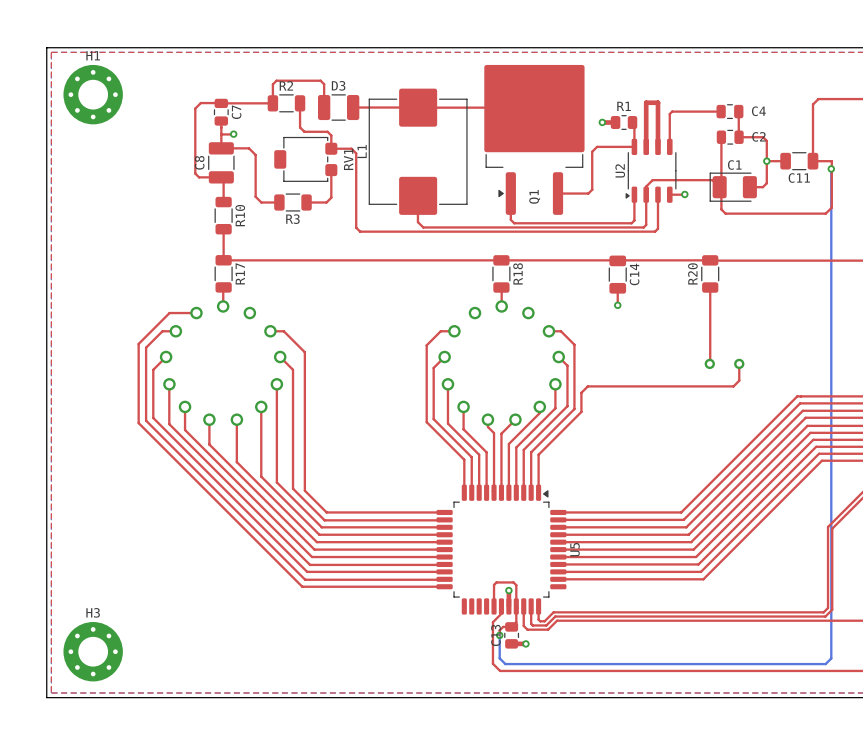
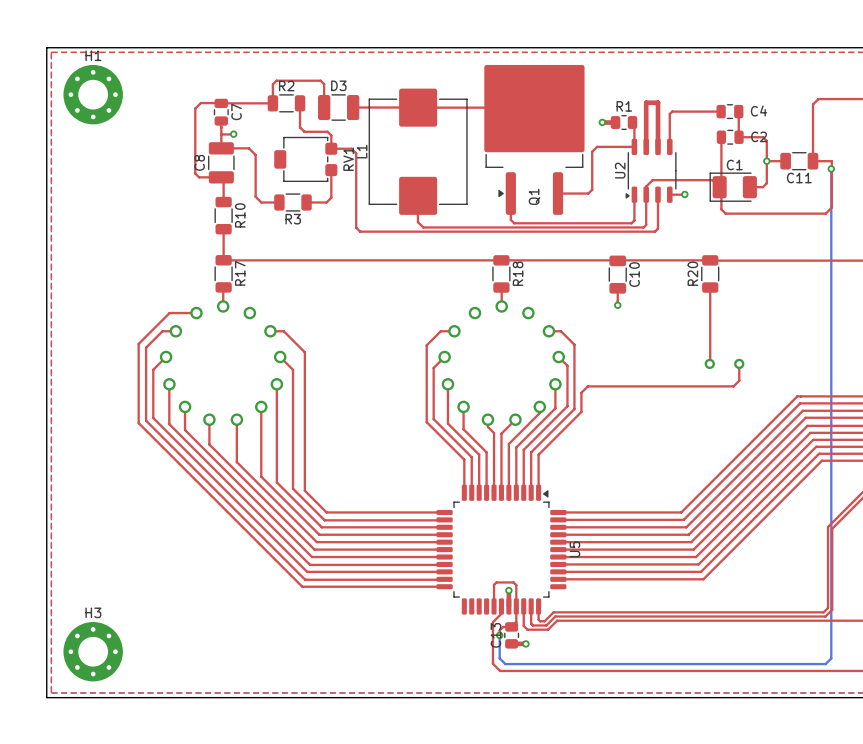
C14 name: C14 (634, 274) -> C10 (634, 274)

